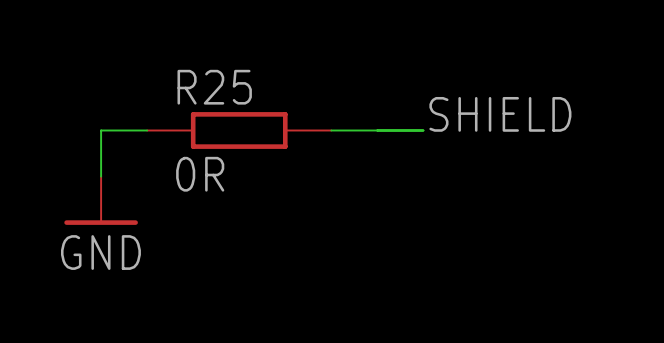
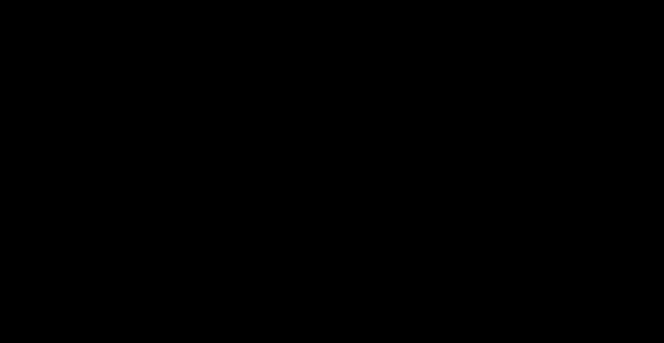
label: SHIELD (500, 114) -> none
wire: (147, 130) (101, 130) (101, 176) -> none
R25: 0R (239, 130) -> none
wire: (331, 130) (423, 130) -> none
power symbol: GND (101, 200) -> none

